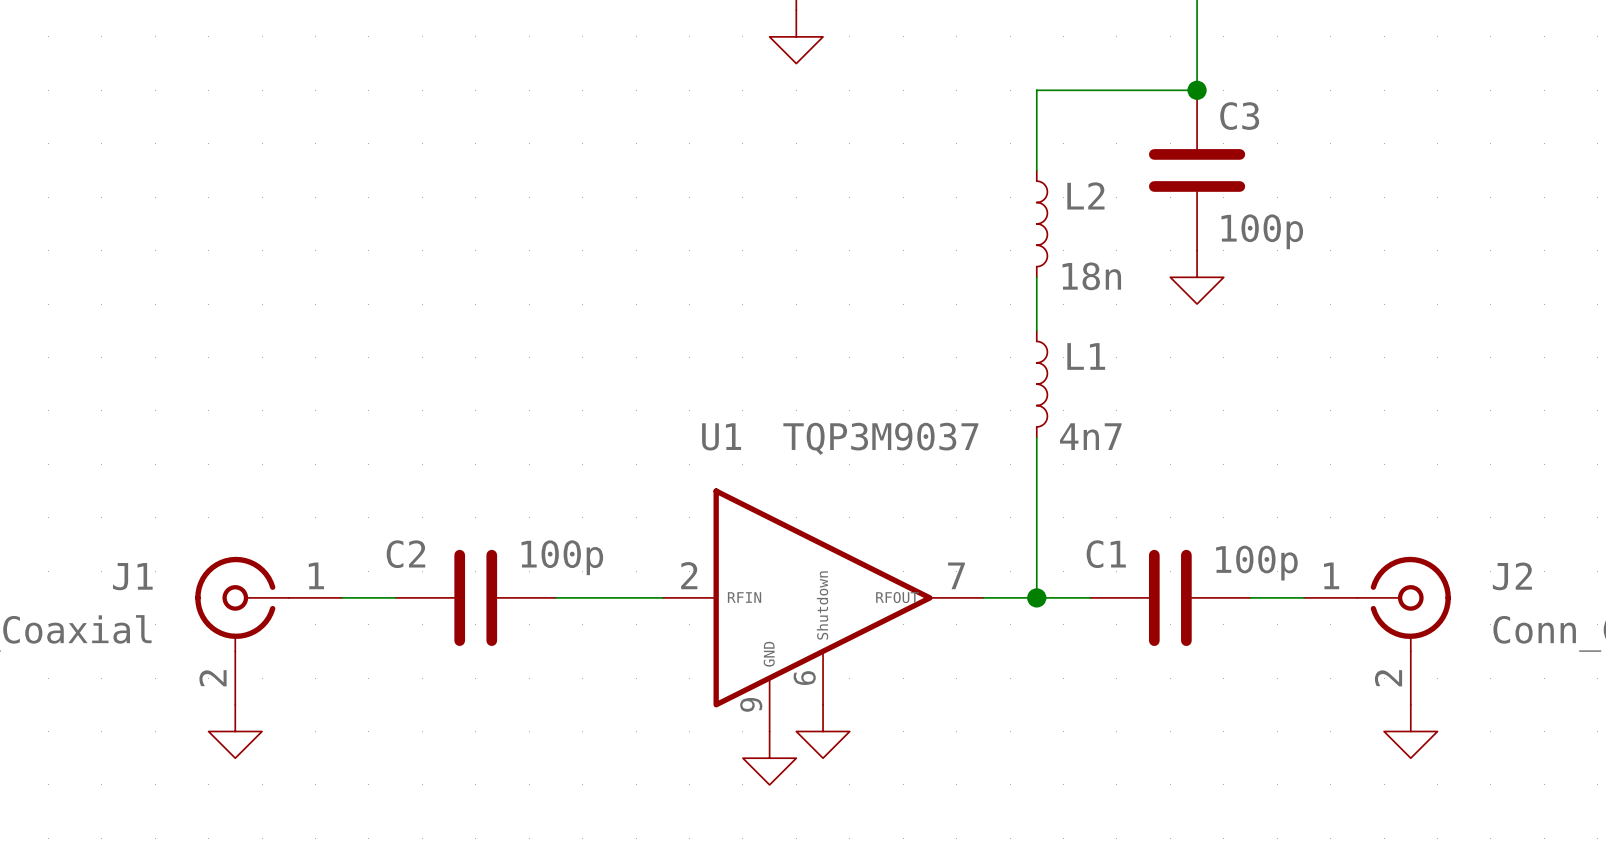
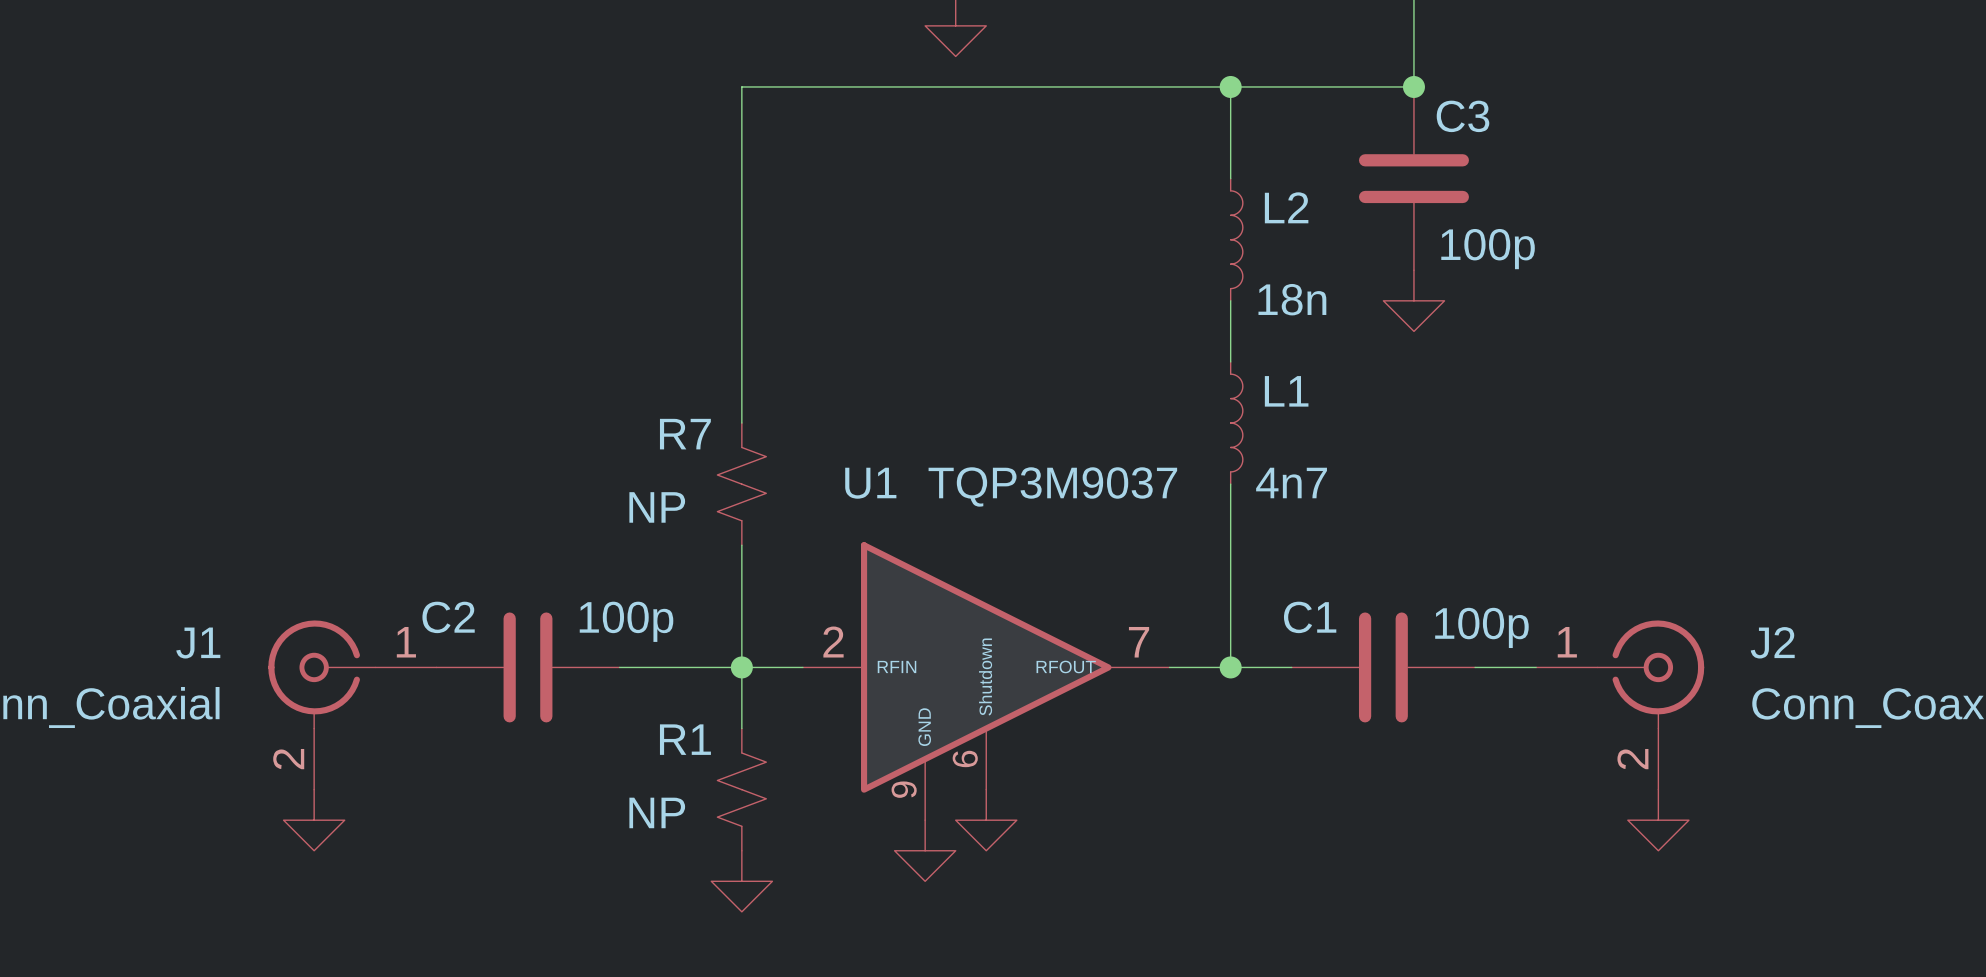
wire: none -> (1230, 86) (741, 86) (741, 423)
junction: none -> (1230, 86)
R7: none -> NP (741, 484)
wire: none -> (741, 545) (741, 728)
C2 position: (475, 597) -> (527, 667)
junction: none -> (741, 667)
R1: none -> NP (741, 789)
power symbol: none -> (741, 881)

